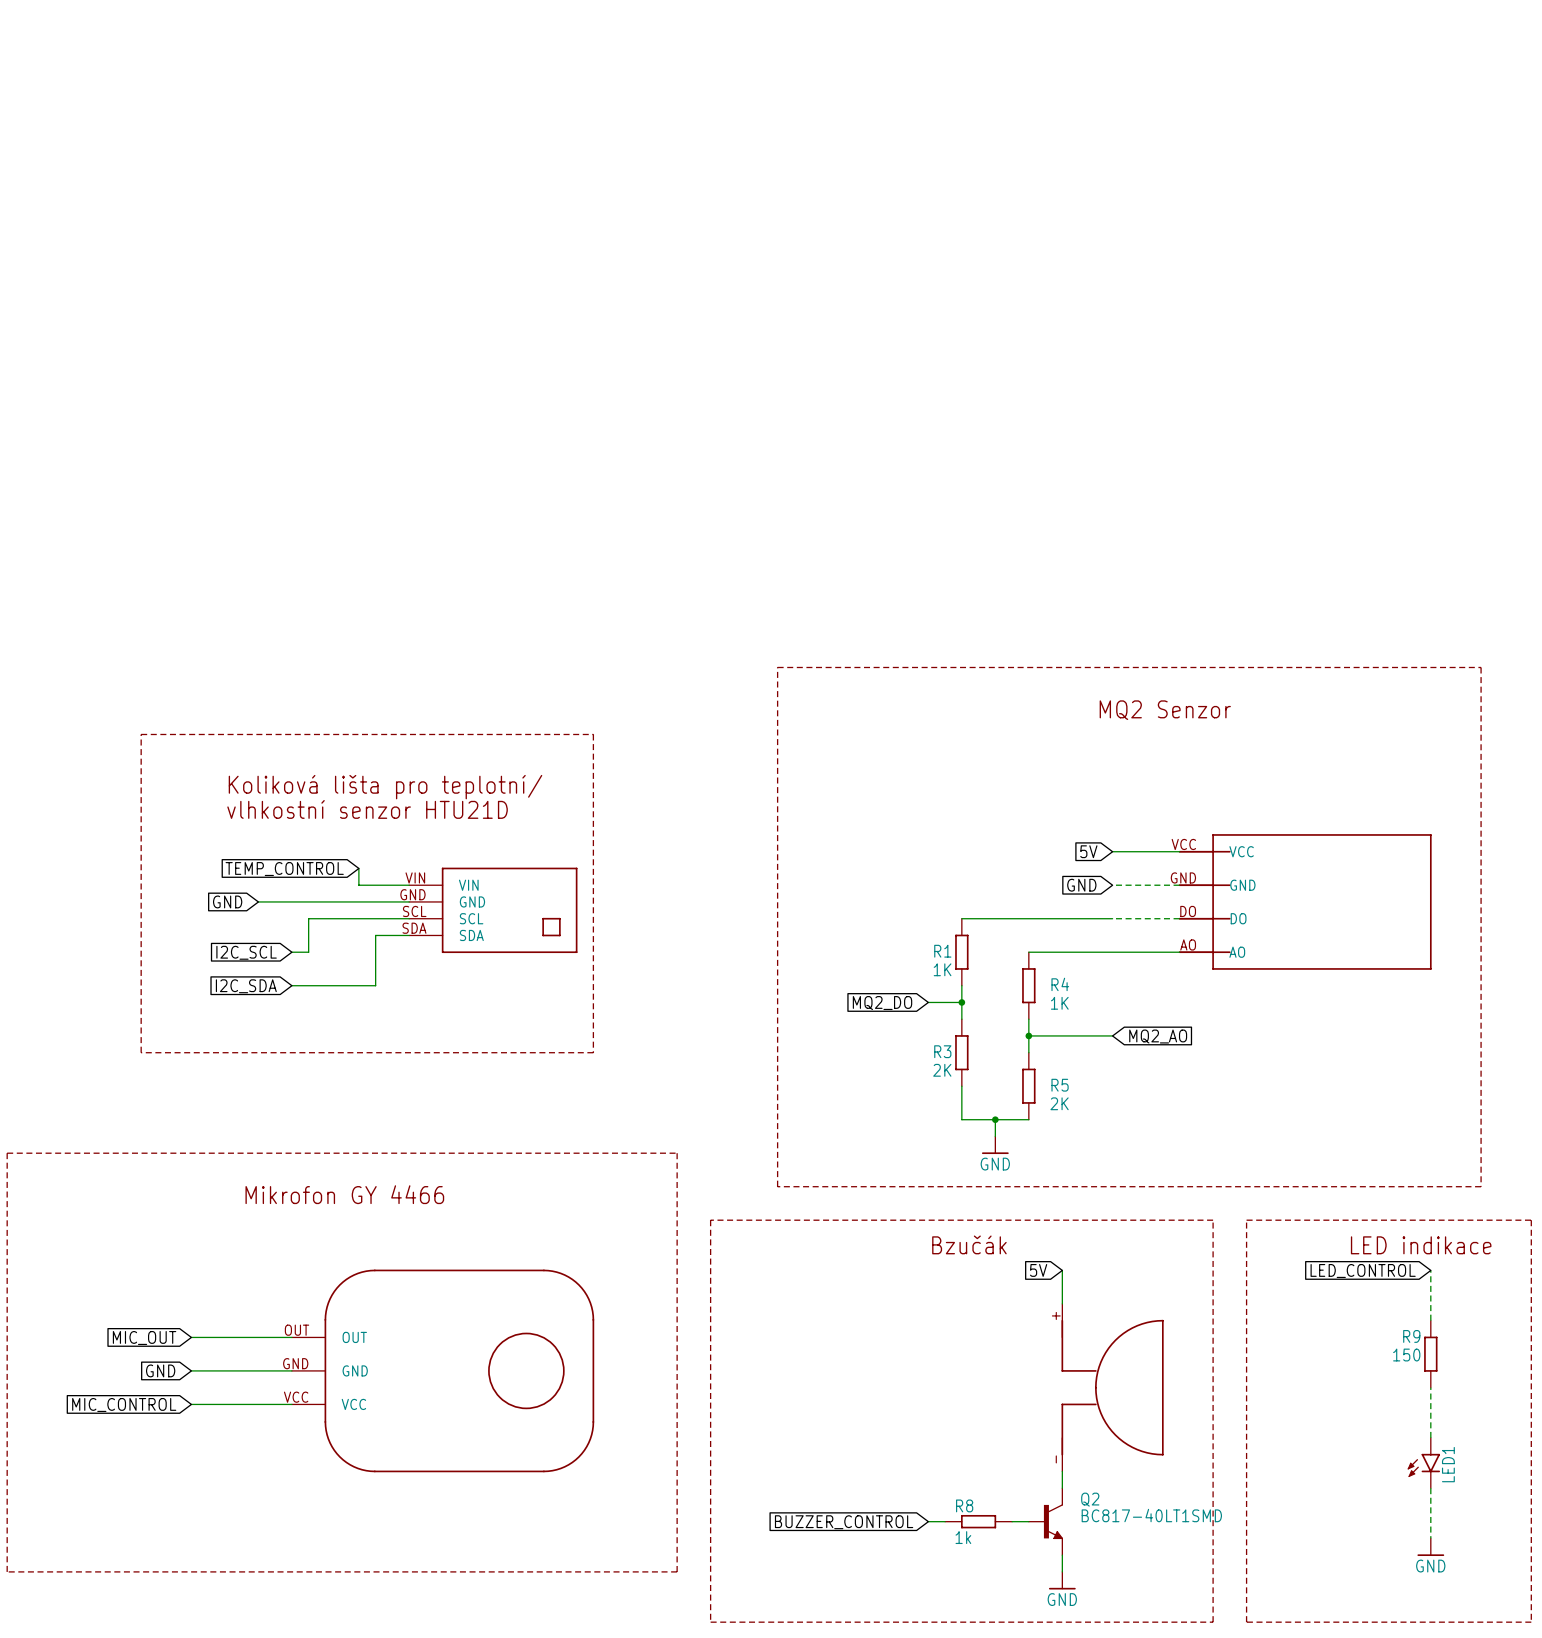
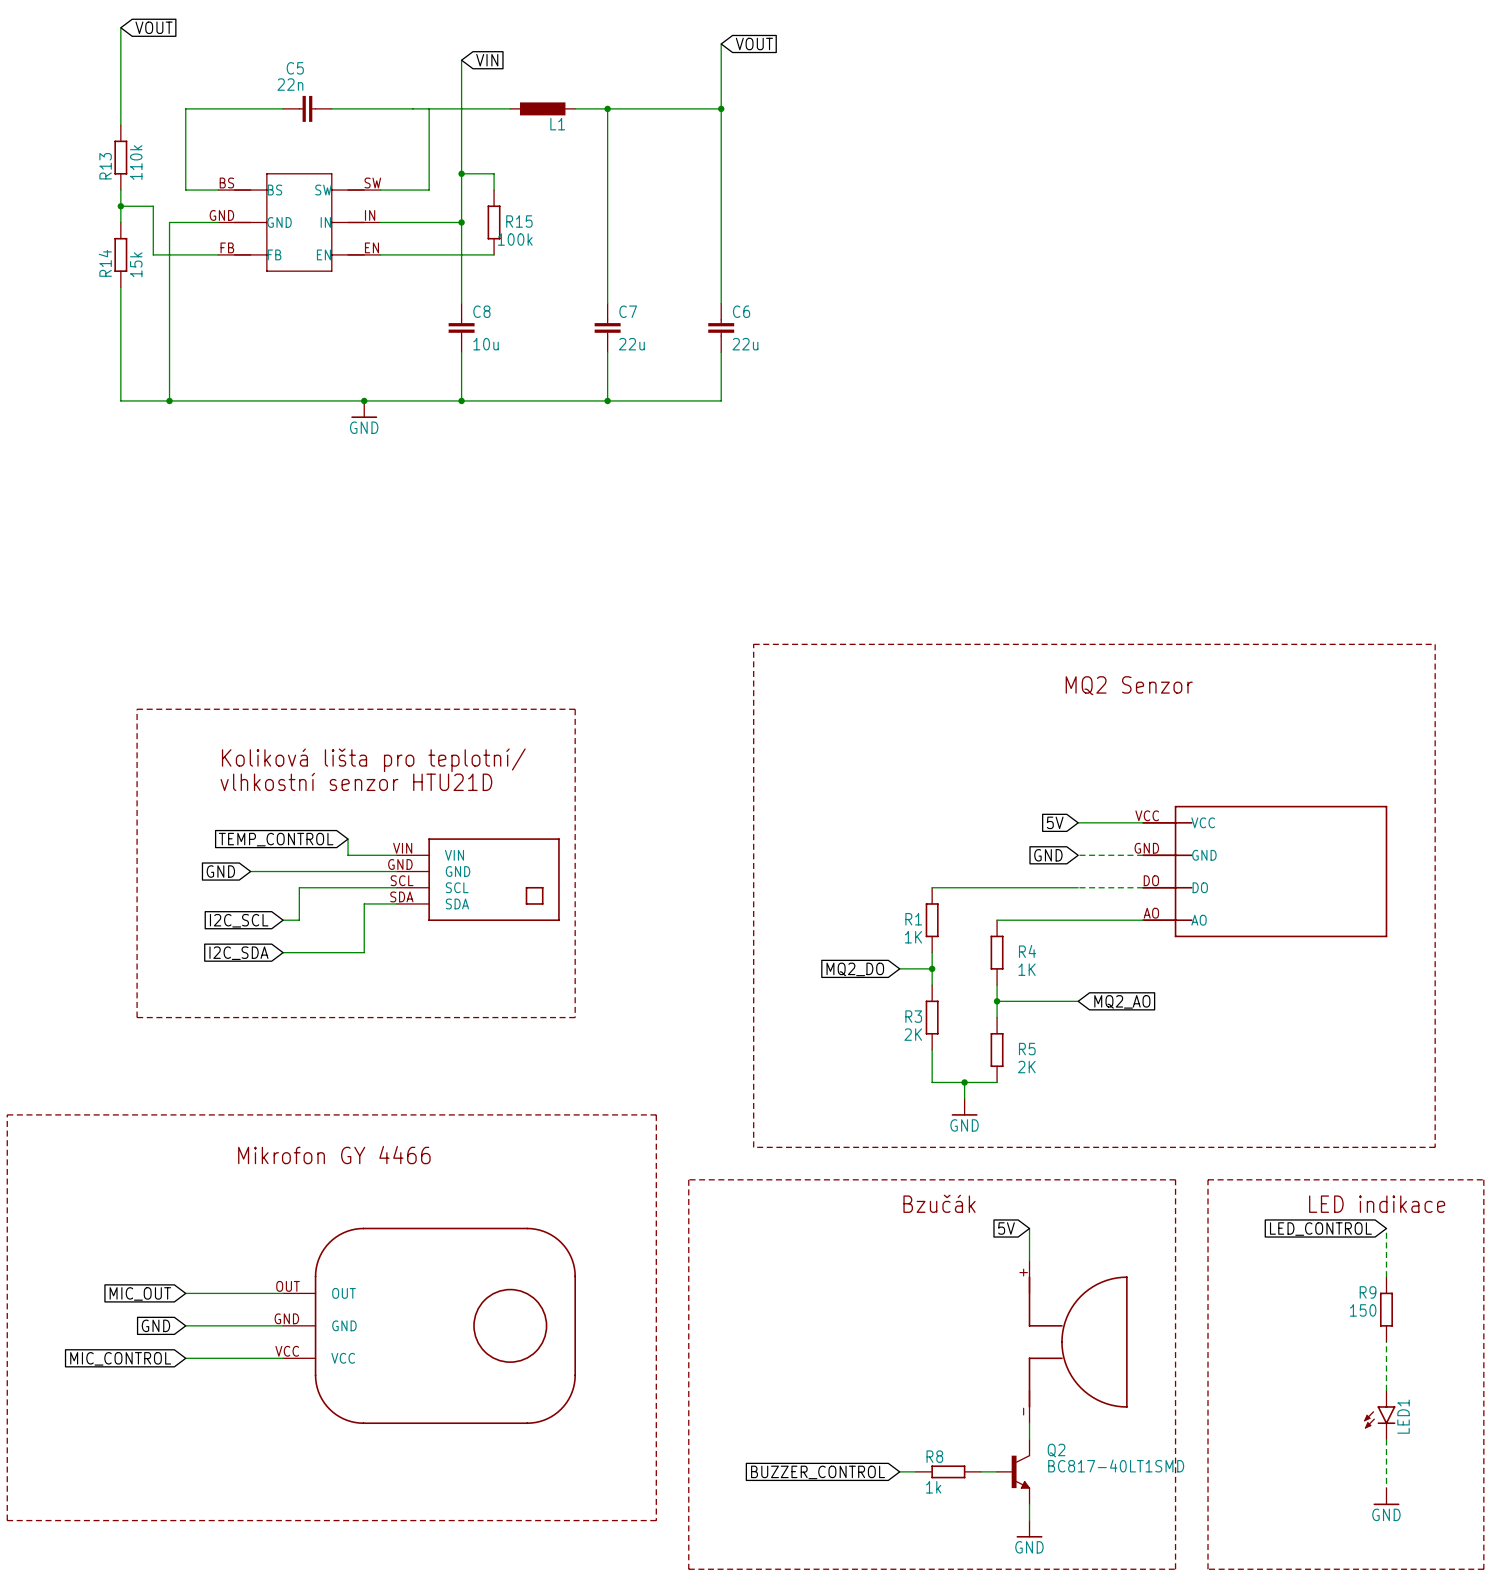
wire: none -> (120, 27) (120, 125)
global label: none -> VOUT (154, 27)
wire: none -> (721, 43) (721, 303)
global label: none -> VOUT (754, 43)
wire: none -> (461, 60) (461, 303)
global label: none -> VIN (487, 60)
wire: none -> (283, 108) (185, 108) (185, 190) (218, 190)
C5: none -> 22n (307, 108)
wire: none -> (331, 108) (510, 108)
wire: none -> (429, 108) (429, 190) (380, 190)
L1: none -> (542, 108)
wire: none -> (575, 108) (721, 108)
wire: none -> (607, 108) (607, 303)
junction: none -> (607, 108)
junction: none -> (721, 108)
R13: none -> 110k (120, 157)
wire: none -> (461, 173) (494, 173) (494, 190)
junction: none -> (461, 173)
wire: none -> (120, 190) (120, 222)
wire: none -> (120, 206) (153, 206) (153, 254) (218, 254)
junction: none -> (120, 206)
wire: none -> (218, 222) (169, 222) (169, 400)
part: none -> (299, 222)
wire: none -> (380, 222) (461, 222)
junction: none -> (461, 222)
R15: none -> 100k (494, 222)
R14: none -> 15k (120, 254)
wire: none -> (380, 254) (494, 254)
wire: none -> (120, 287) (120, 400) (721, 400) (721, 352)
C8: none -> 10u (461, 327)
C7: none -> 22u (607, 327)
C6: none -> 22u (721, 327)
wire: none -> (461, 352) (461, 400)
wire: none -> (607, 352) (607, 400)
junction: none -> (169, 400)
junction: none -> (364, 400)
junction: none -> (461, 400)
junction: none -> (607, 400)
power symbol: none -> GND (364, 409)

